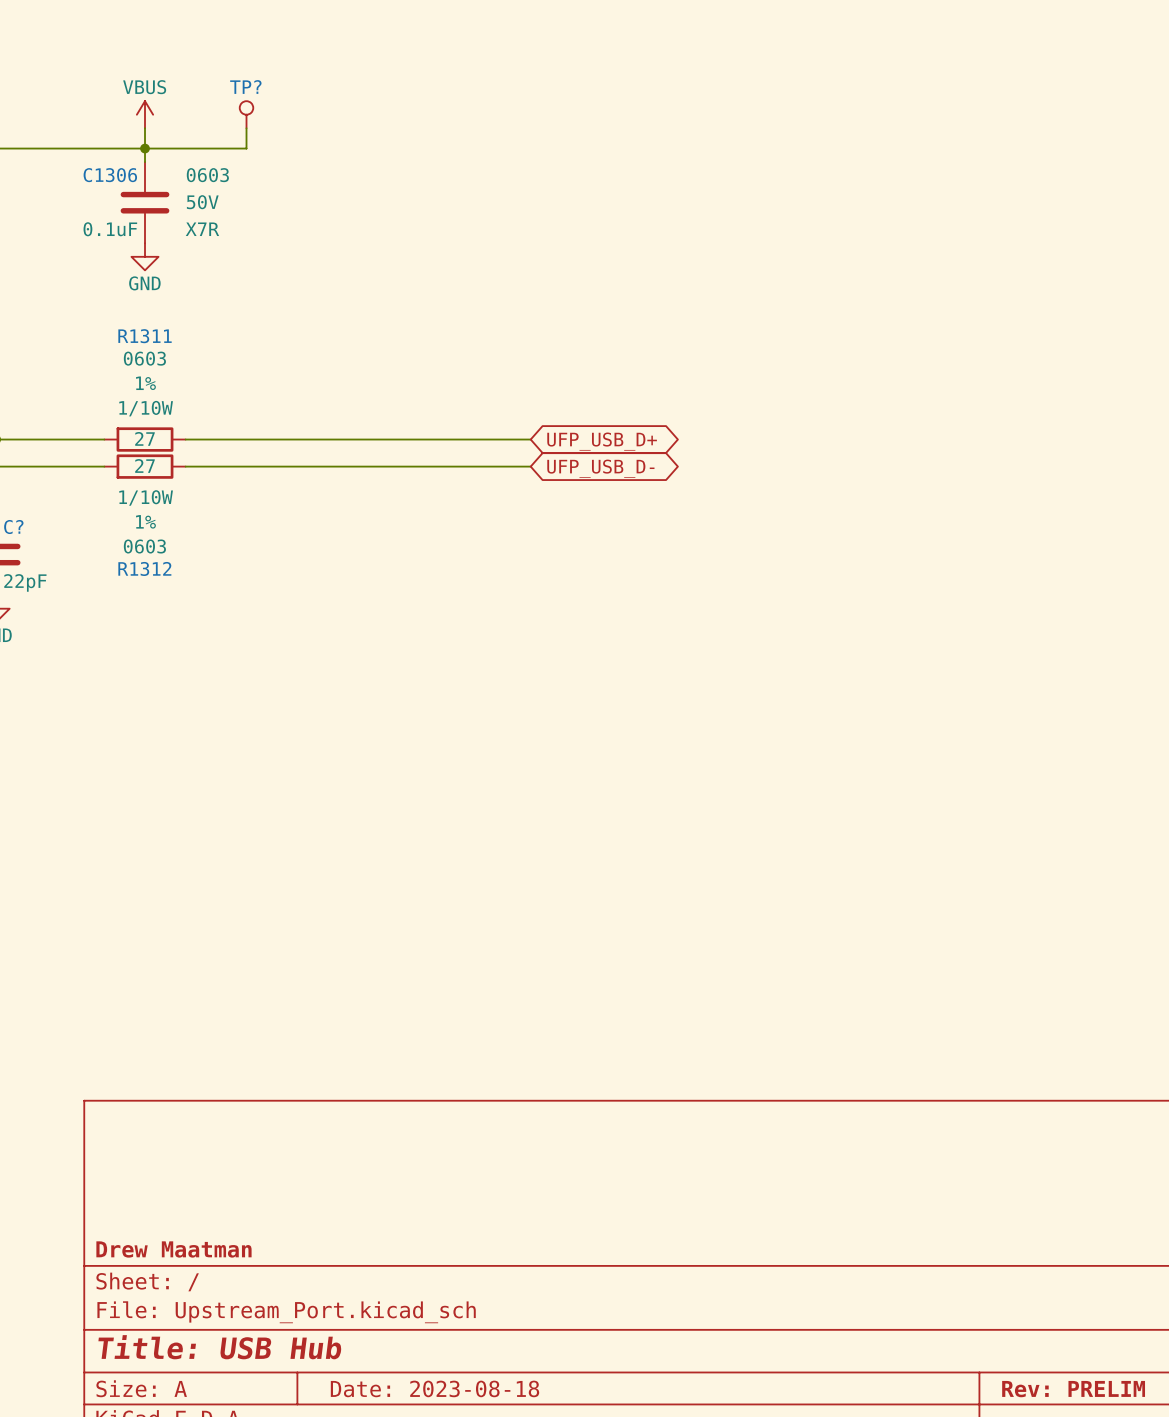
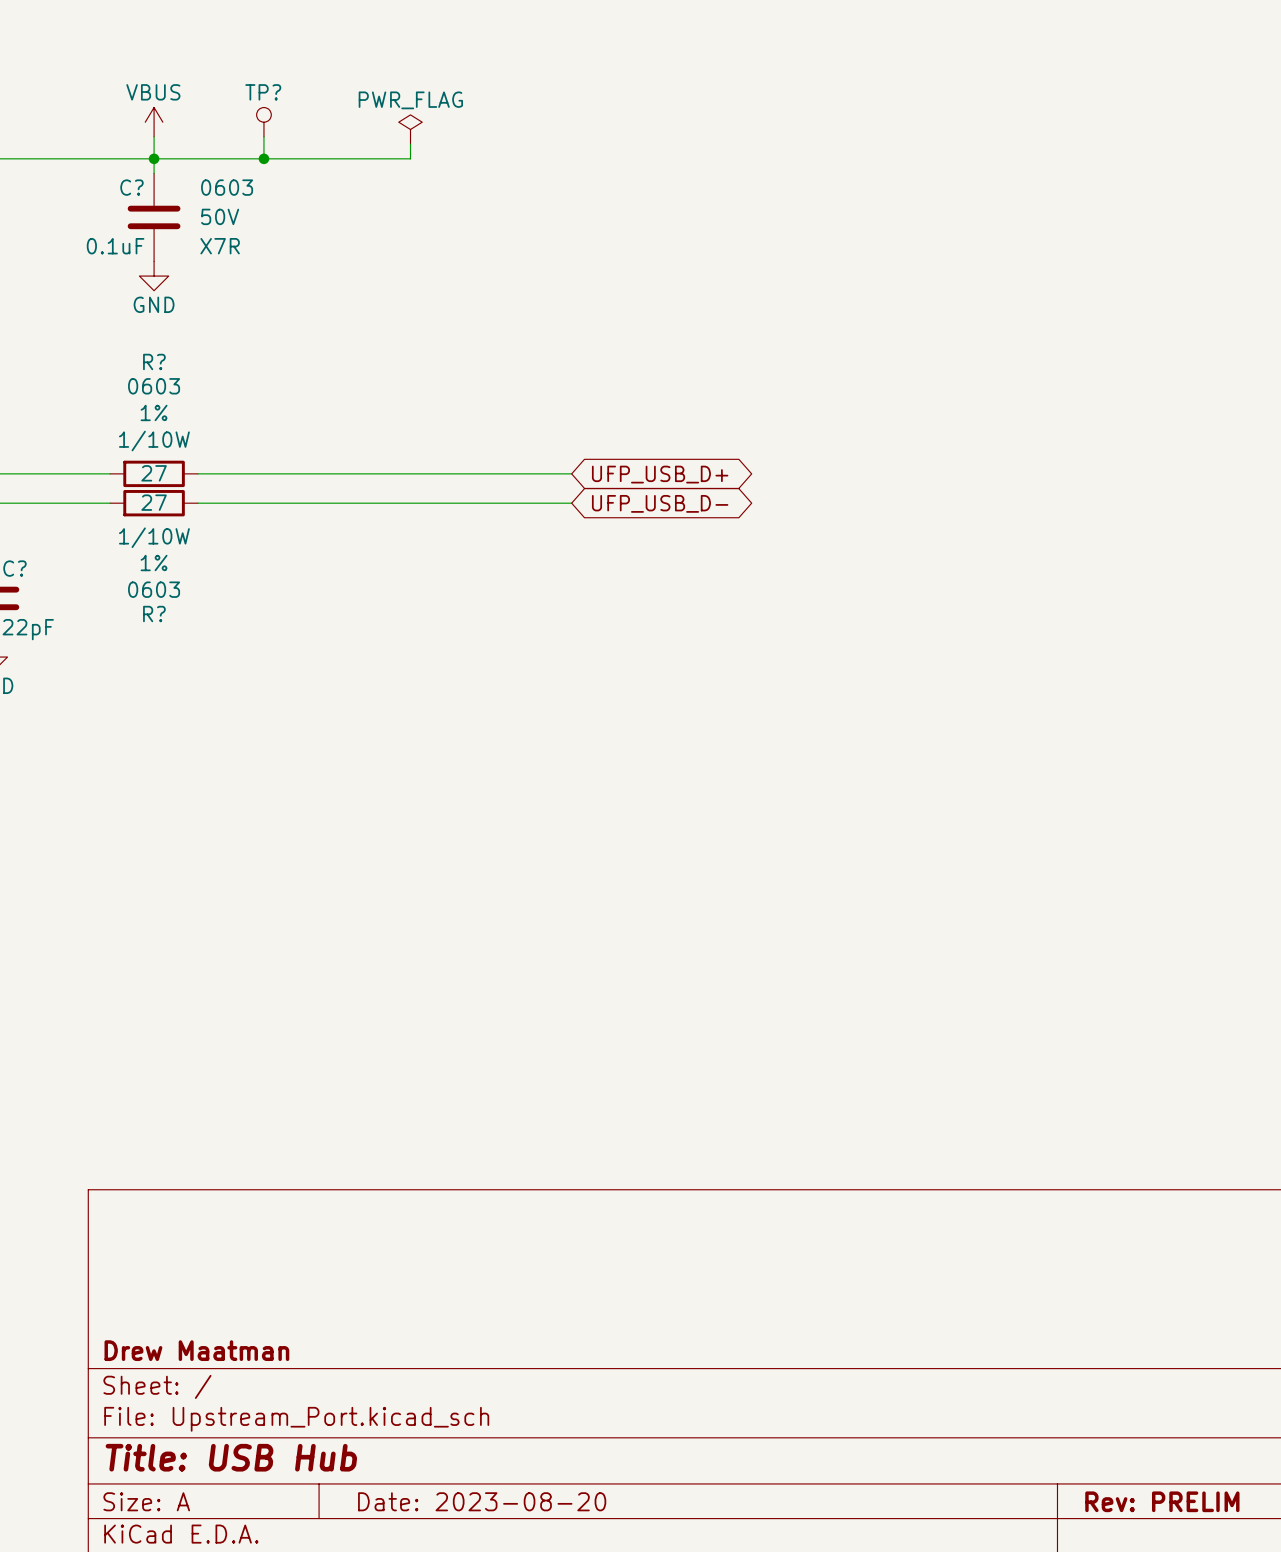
power symbol: none -> PWR_FLAG (410, 129)
wire: none -> (410, 144) (410, 158) (263, 158)
junction: none -> (263, 158)
C1306 name: C1306 (110, 175) -> C? (131, 187)
R1311 name: R1311 (145, 336) -> R? (154, 361)
R1312 name: R1312 (144, 568) -> R? (154, 614)
title block: Date: 2023-08-18 (434, 1388) -> Date: 2023-08-20 (482, 1501)

